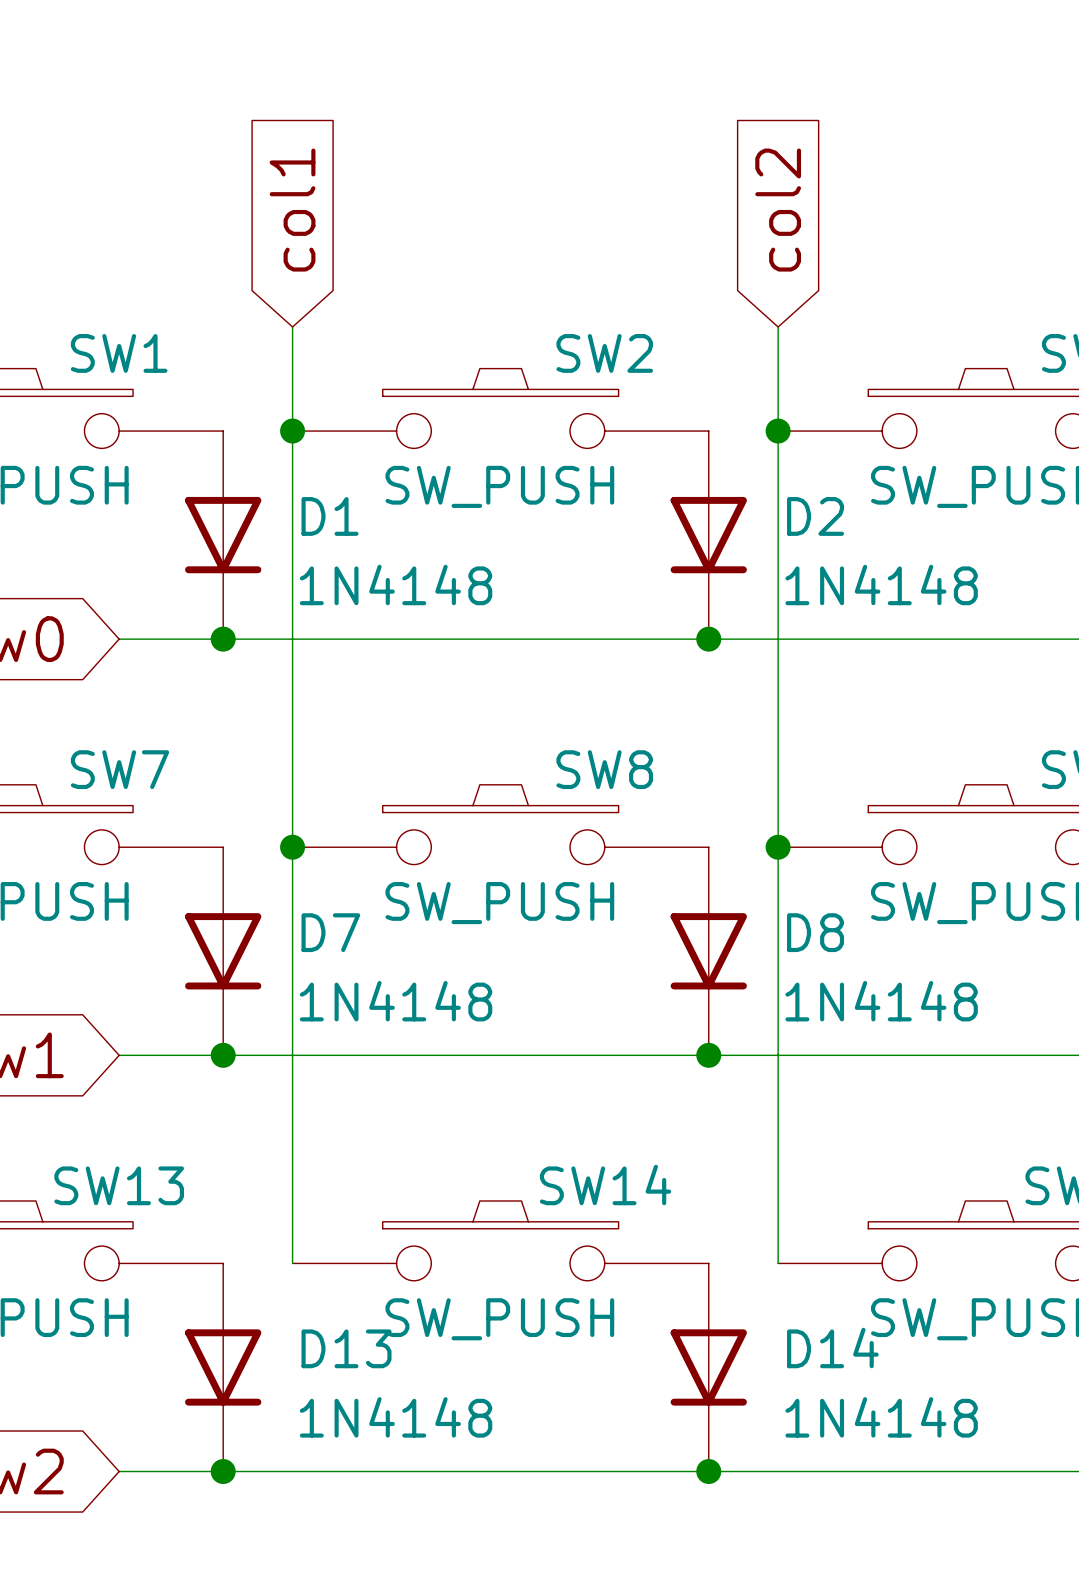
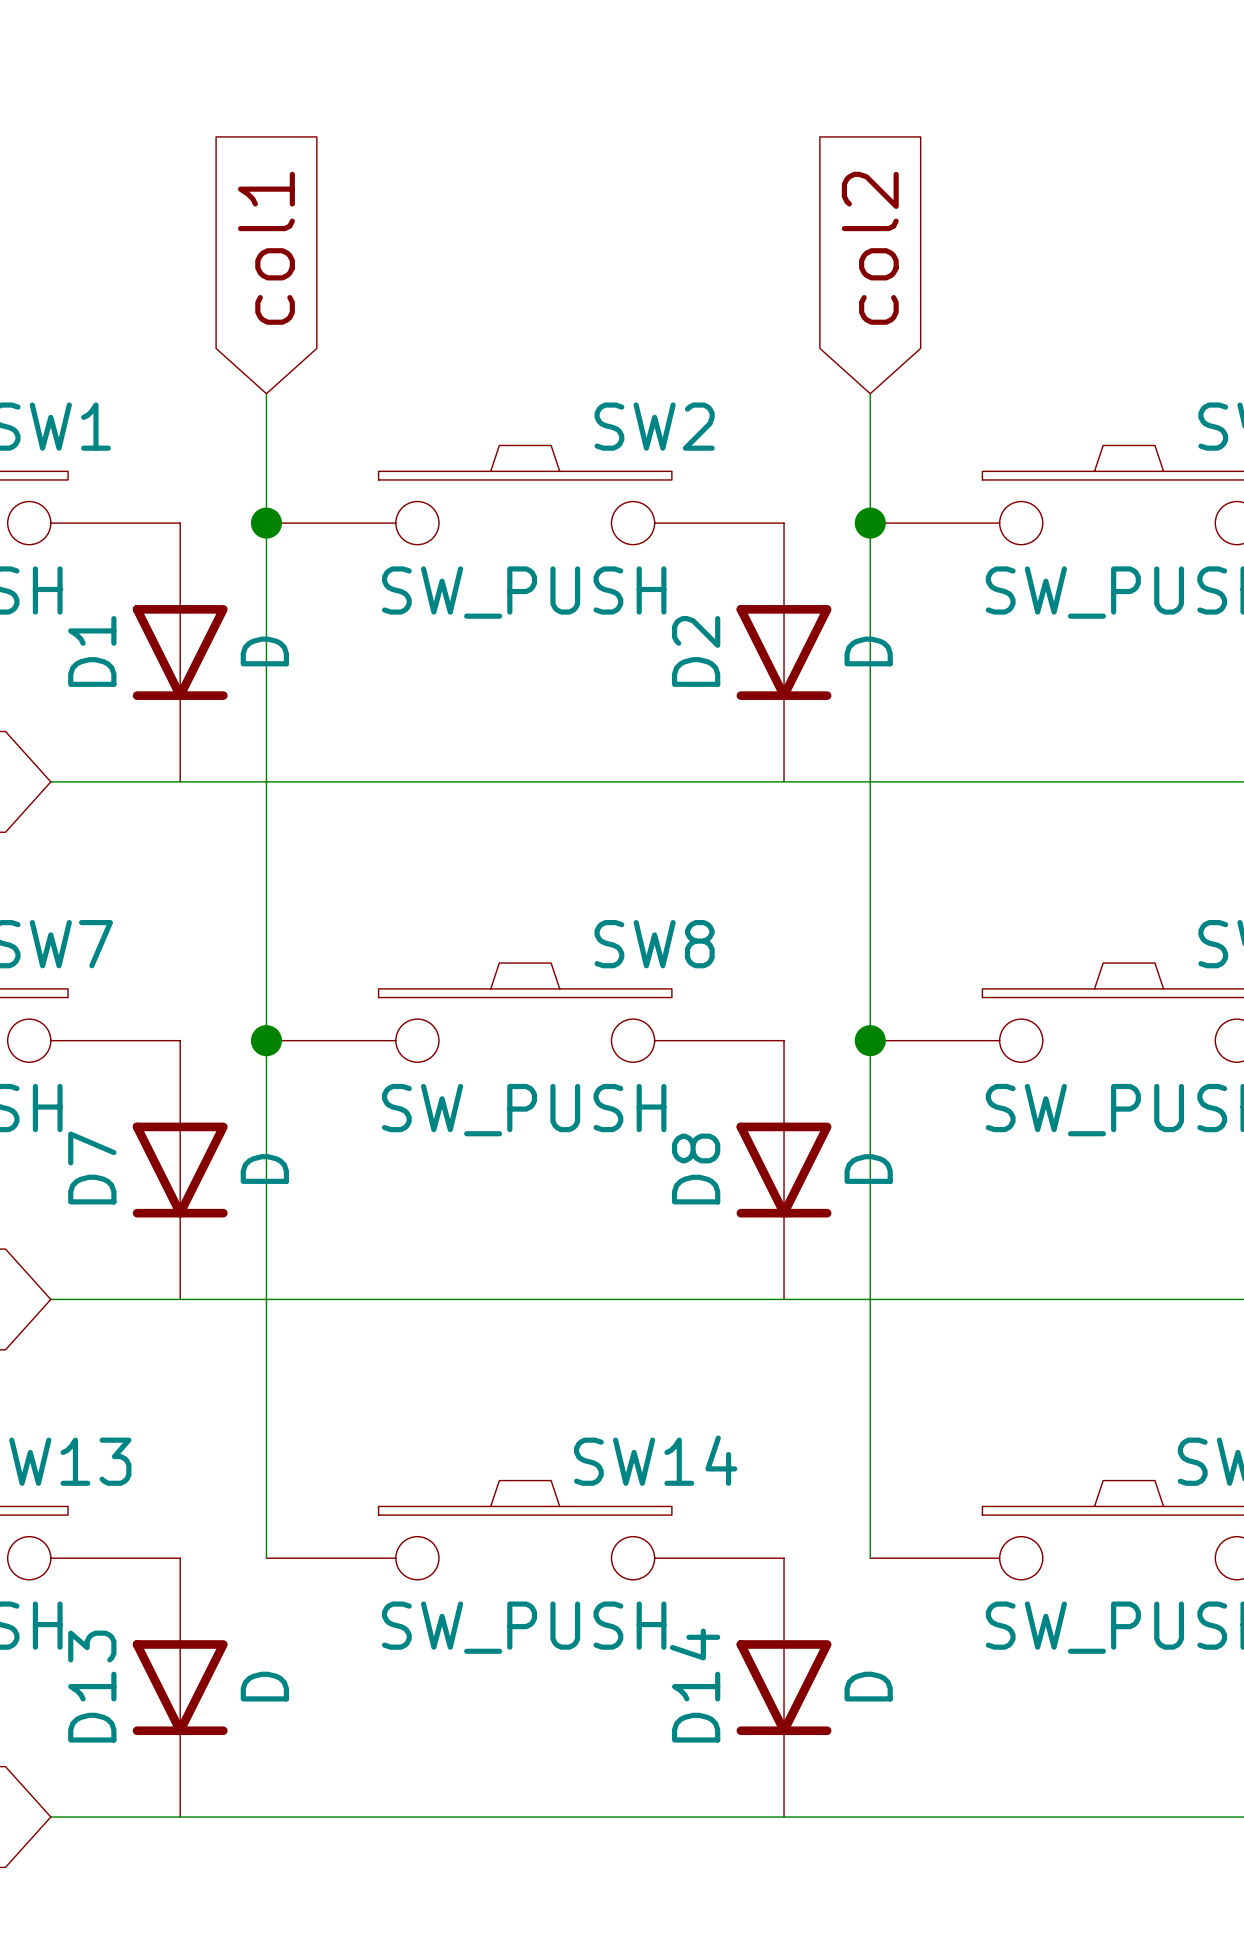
D1 name rotation: 0° (329, 516) -> 90° counterclockwise (92, 651)
D1 name position: D1 (329, 516) -> D1 (92, 651)
D2 name rotation: 0° (815, 516) -> 90° counterclockwise (696, 651)
D2 name position: D2 (815, 516) -> D2 (696, 651)
D1 value: 1N4148 (396, 584) -> D (264, 651)
D2 value: 1N4148 (881, 584) -> D (868, 651)
junction: (223, 639) -> none
junction: (708, 639) -> none
D7 name rotation: 0° (330, 932) -> 90° counterclockwise (92, 1168)
D7 name position: D7 (330, 932) -> D7 (92, 1168)
D8 name rotation: 0° (815, 932) -> 90° counterclockwise (696, 1169)
D8 name position: D8 (815, 932) -> D8 (696, 1169)
D7 value: 1N4148 (396, 1001) -> D (264, 1169)
D8 value: 1N4148 (881, 1001) -> D (868, 1169)
junction: (223, 1055) -> none
junction: (708, 1055) -> none
D13 name rotation: 0° (346, 1348) -> 90° counterclockwise (92, 1686)
D13 name position: D13 (346, 1348) -> D13 (92, 1686)
D14 name rotation: 0° (832, 1348) -> 90° counterclockwise (695, 1685)
D14 name position: D14 (832, 1348) -> D14 (695, 1685)
D13 value: 1N4148 (396, 1417) -> D (264, 1686)
D14 value: 1N4148 (881, 1417) -> D (868, 1686)
junction: (223, 1471) -> none
junction: (708, 1471) -> none

